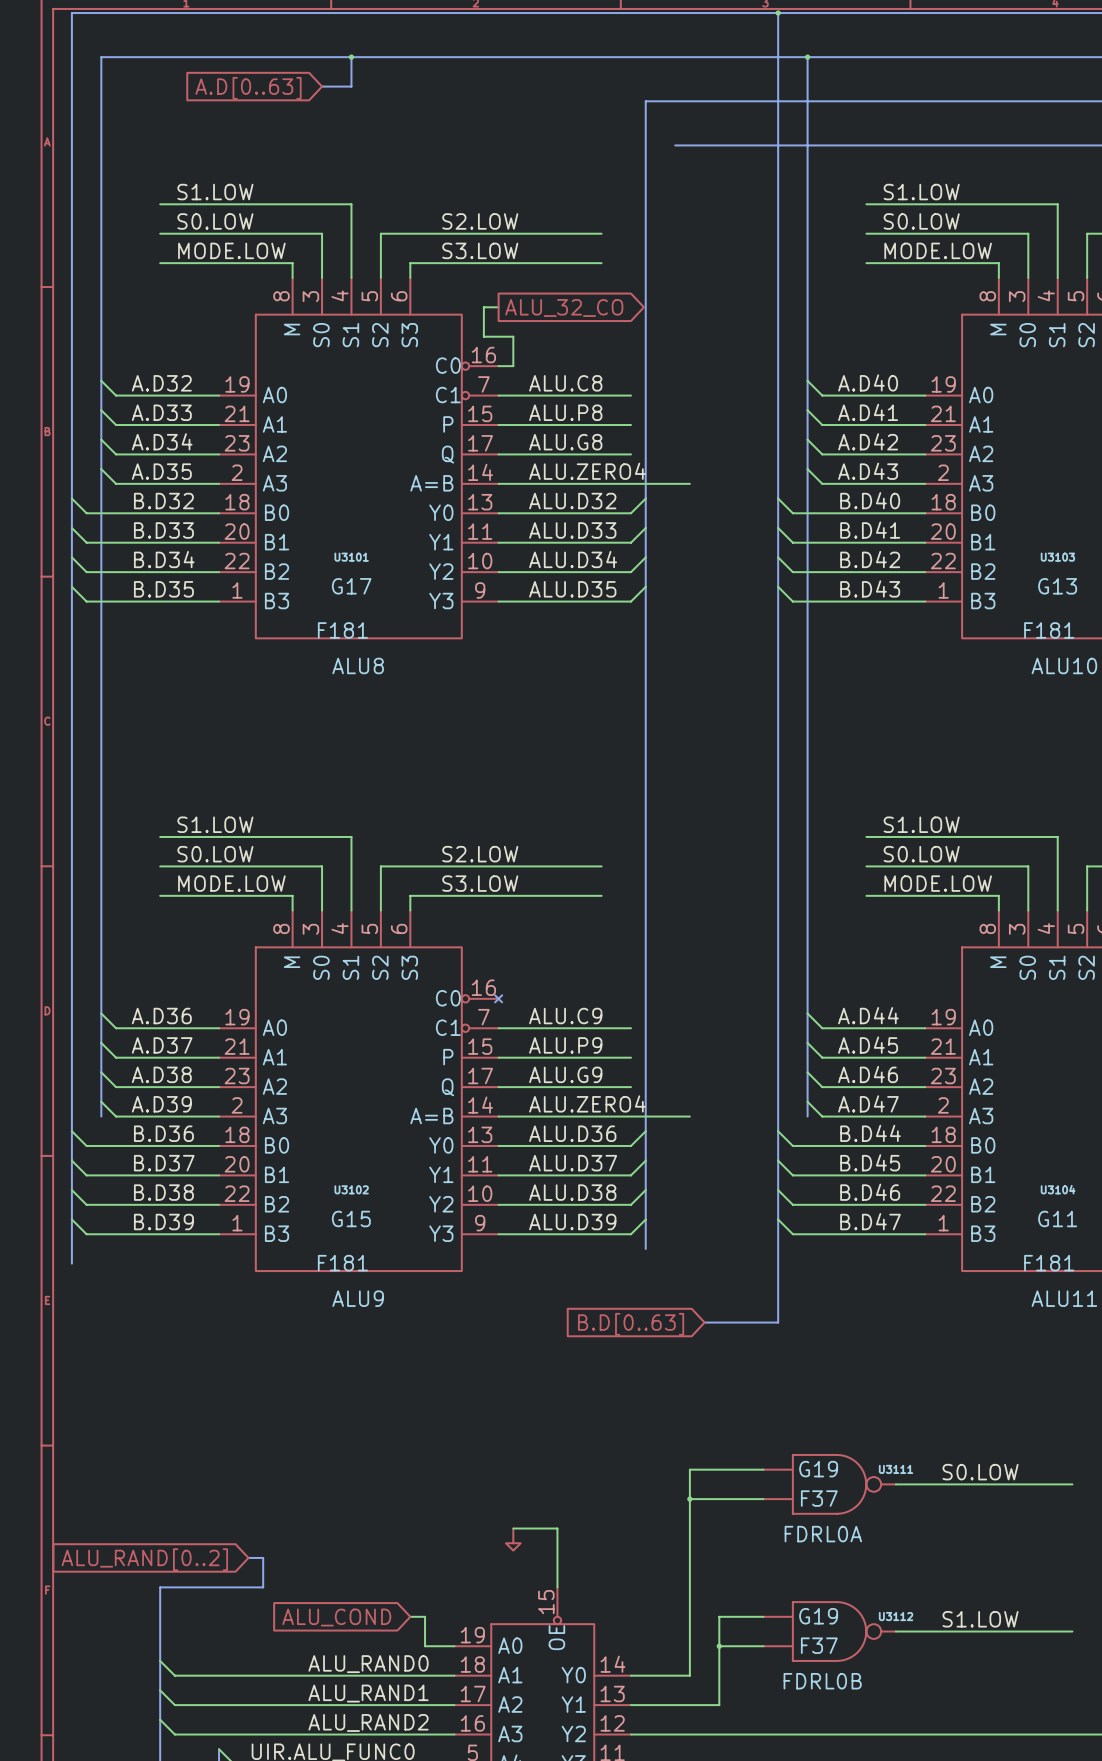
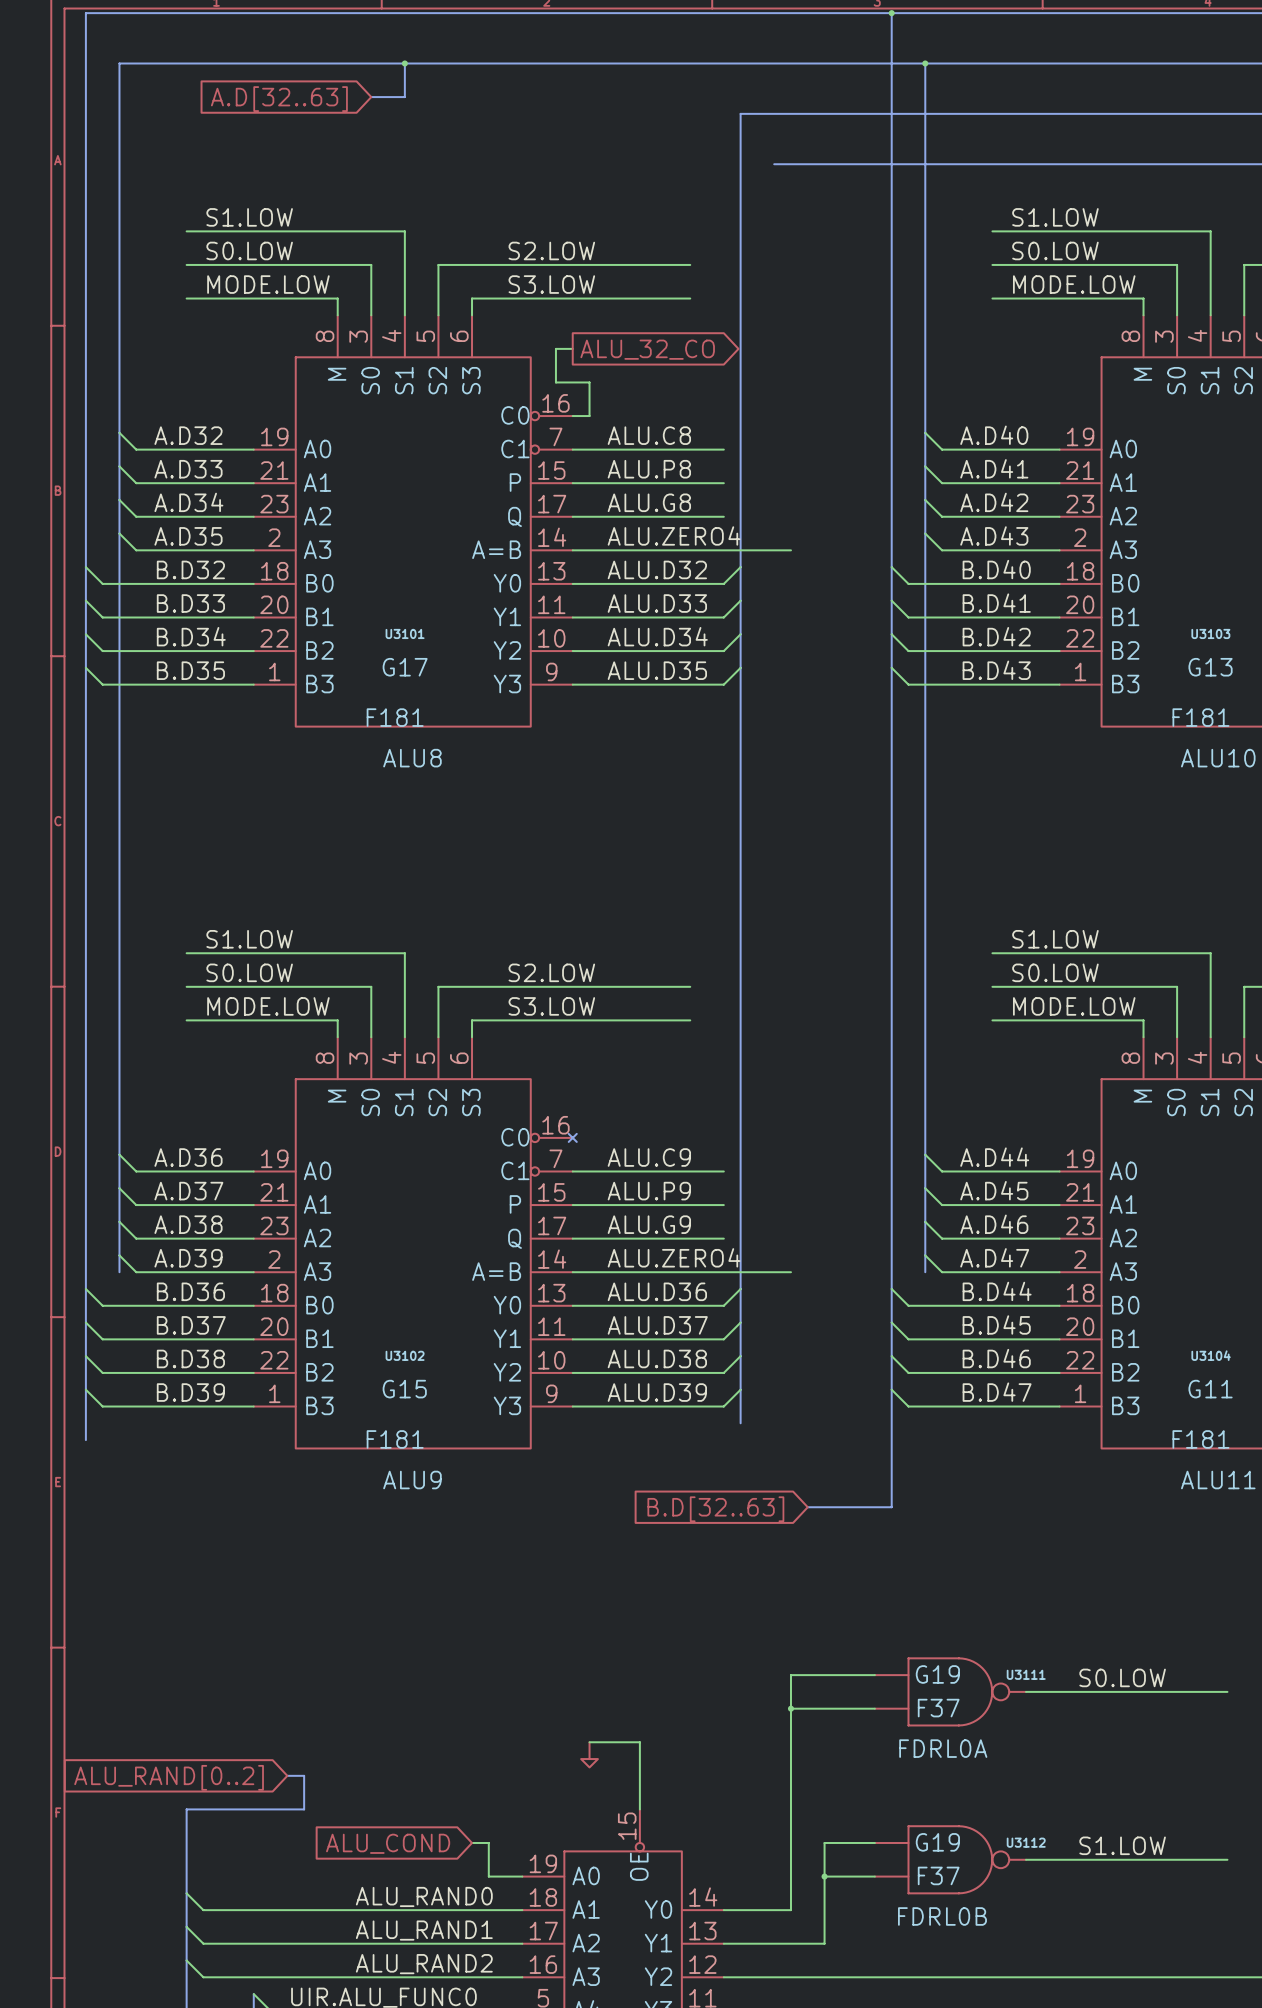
global label: A.D[0..63] (248, 88) -> A.D[32..63] (279, 99)
global label: B.D[0..63] (631, 1324) -> B.D[32..63] (715, 1509)

